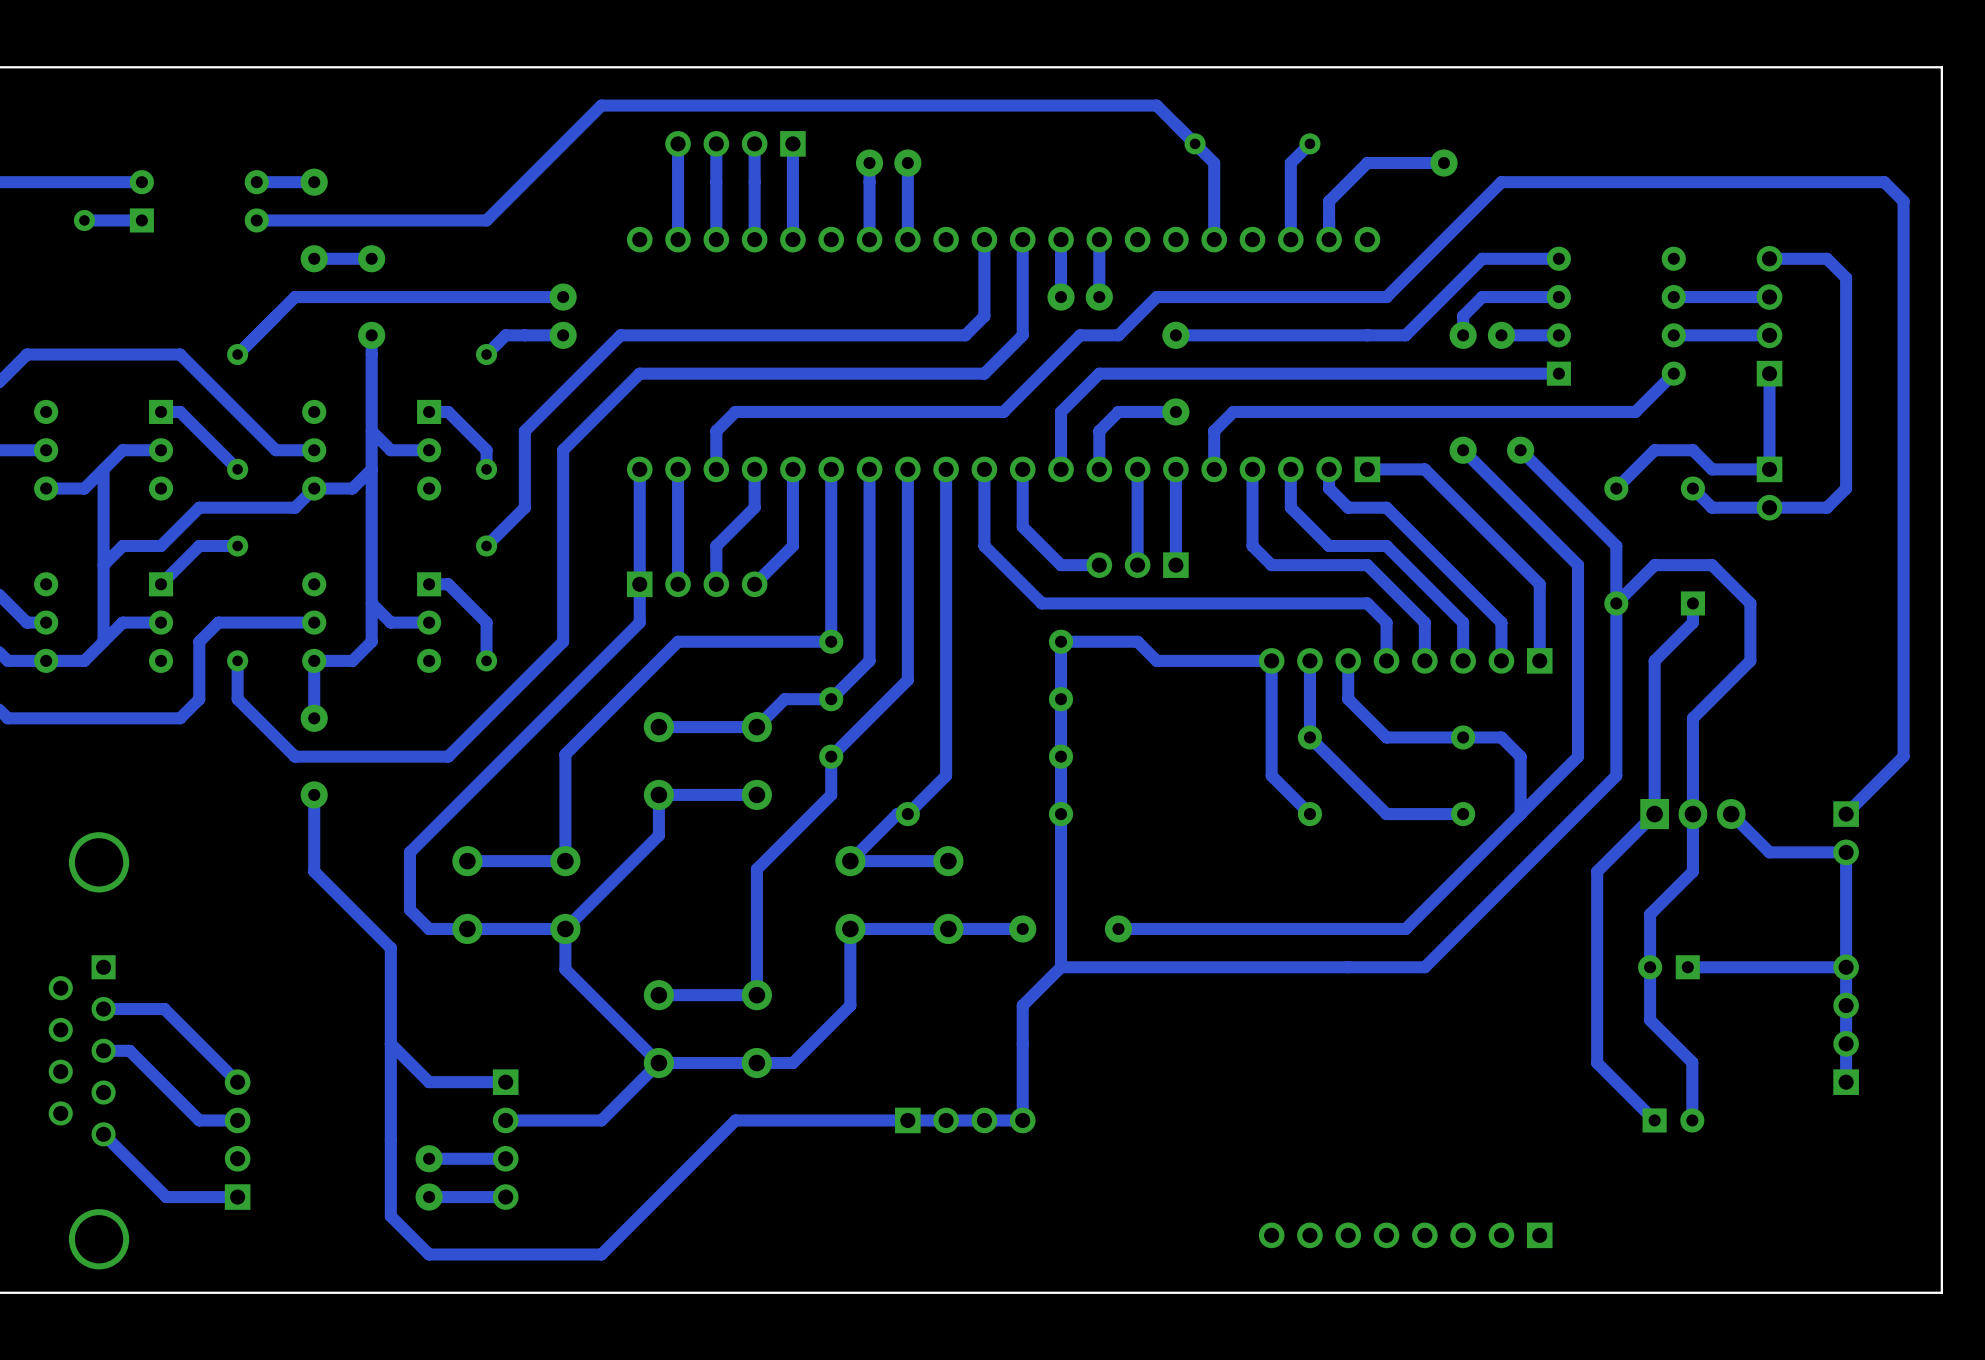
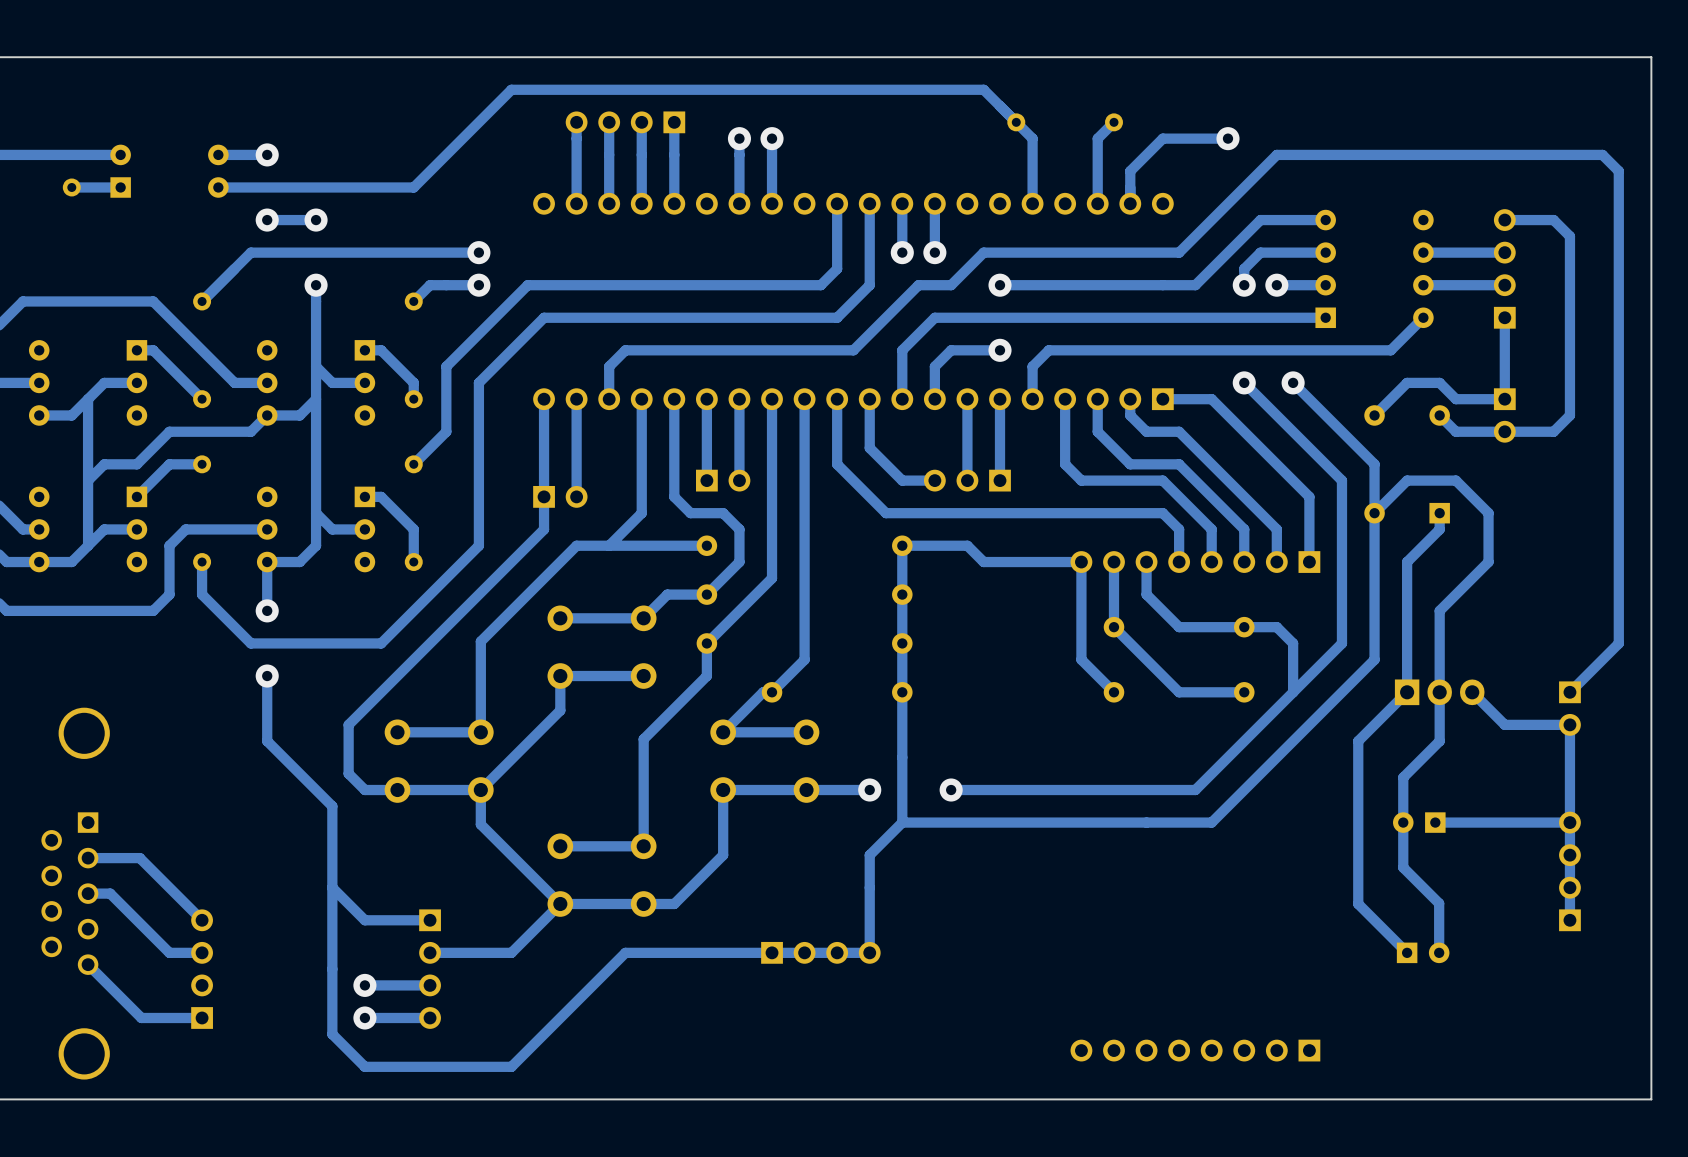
track: (754, 507) (716, 545) (716, 584) -> (641, 431) (641, 513) (609, 545)
track: (792, 545) (754, 584) -> none
track: (831, 565) (831, 641) -> none
part: none -> (723, 480)
track: (869, 565) (869, 622) -> (674, 464) (674, 496) (690, 513) (723, 513) (739, 529)
part: (697, 584) -> none

